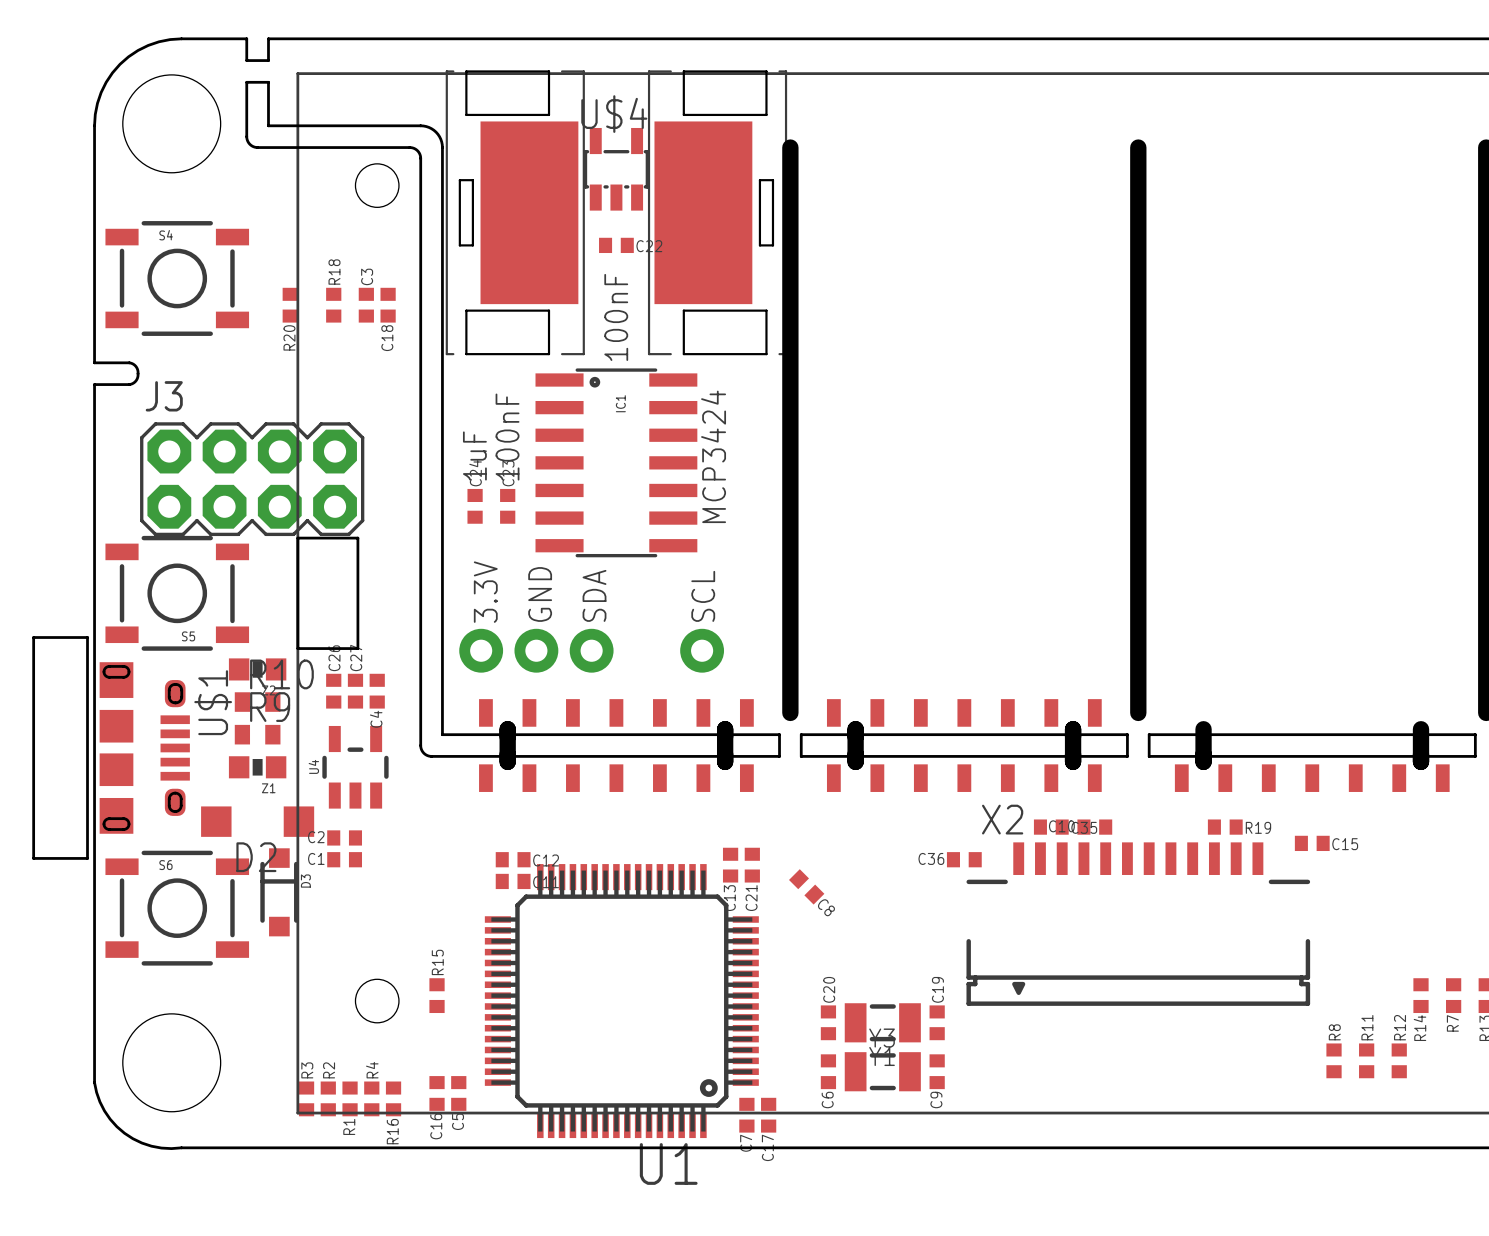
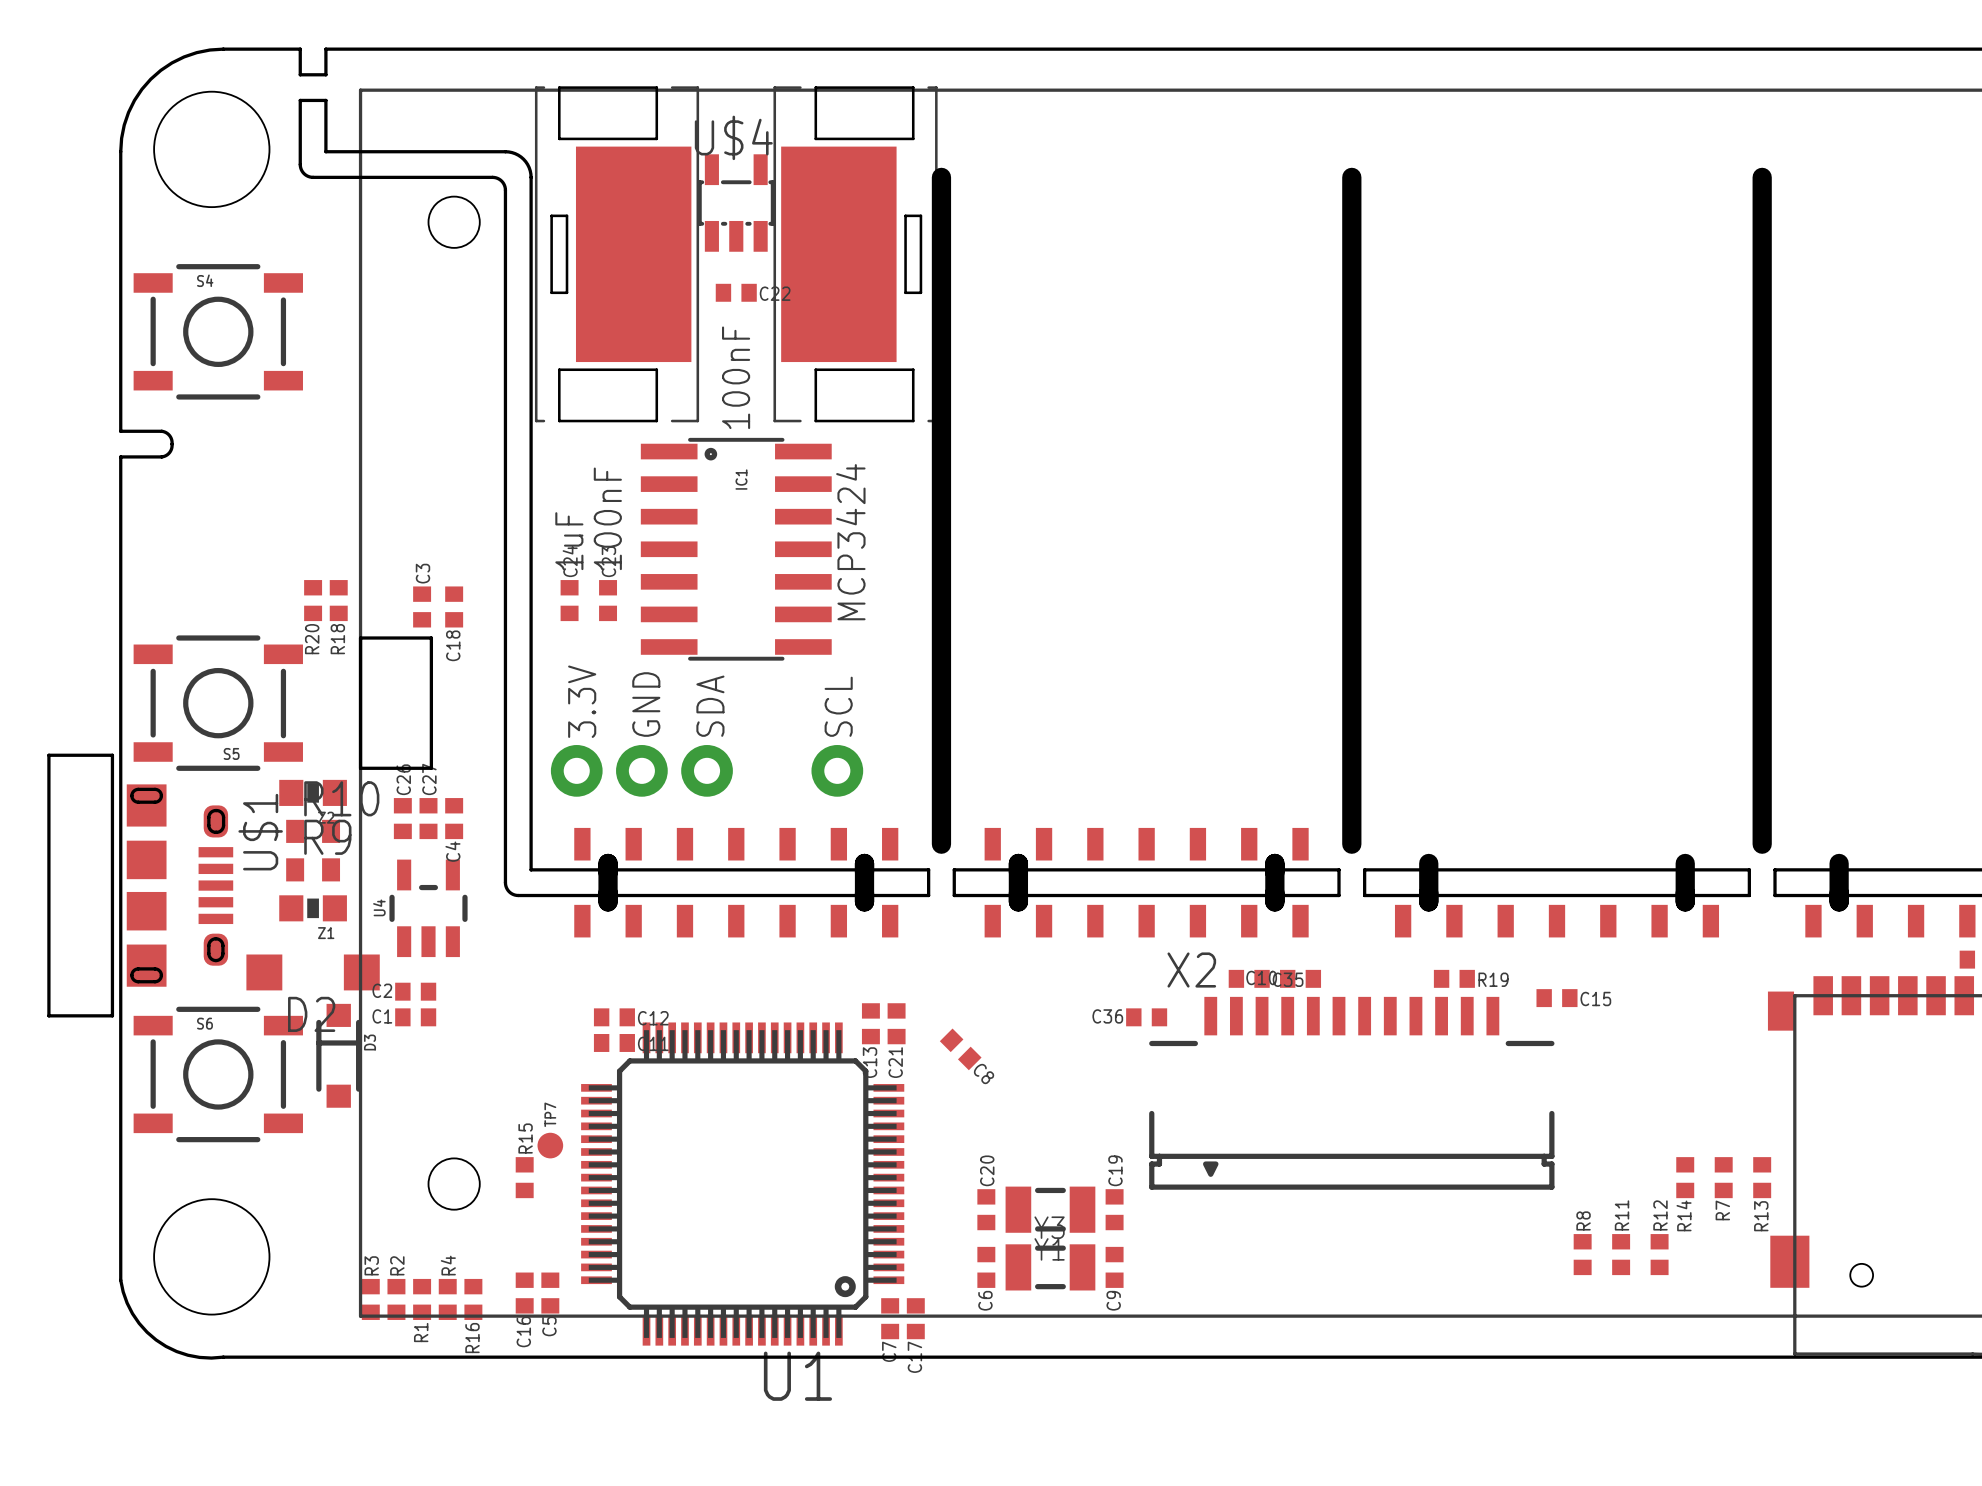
R18 name position: R18 (334, 272) -> R18 (337, 639)
R20 position: (290, 305) -> (313, 600)
R18 position: (333, 305) -> (338, 600)
C3 position: (366, 305) -> (422, 606)
C18 position: (388, 305) -> (454, 606)
J3: (252, 479) -> none
TP7: none -> (550, 1145)

